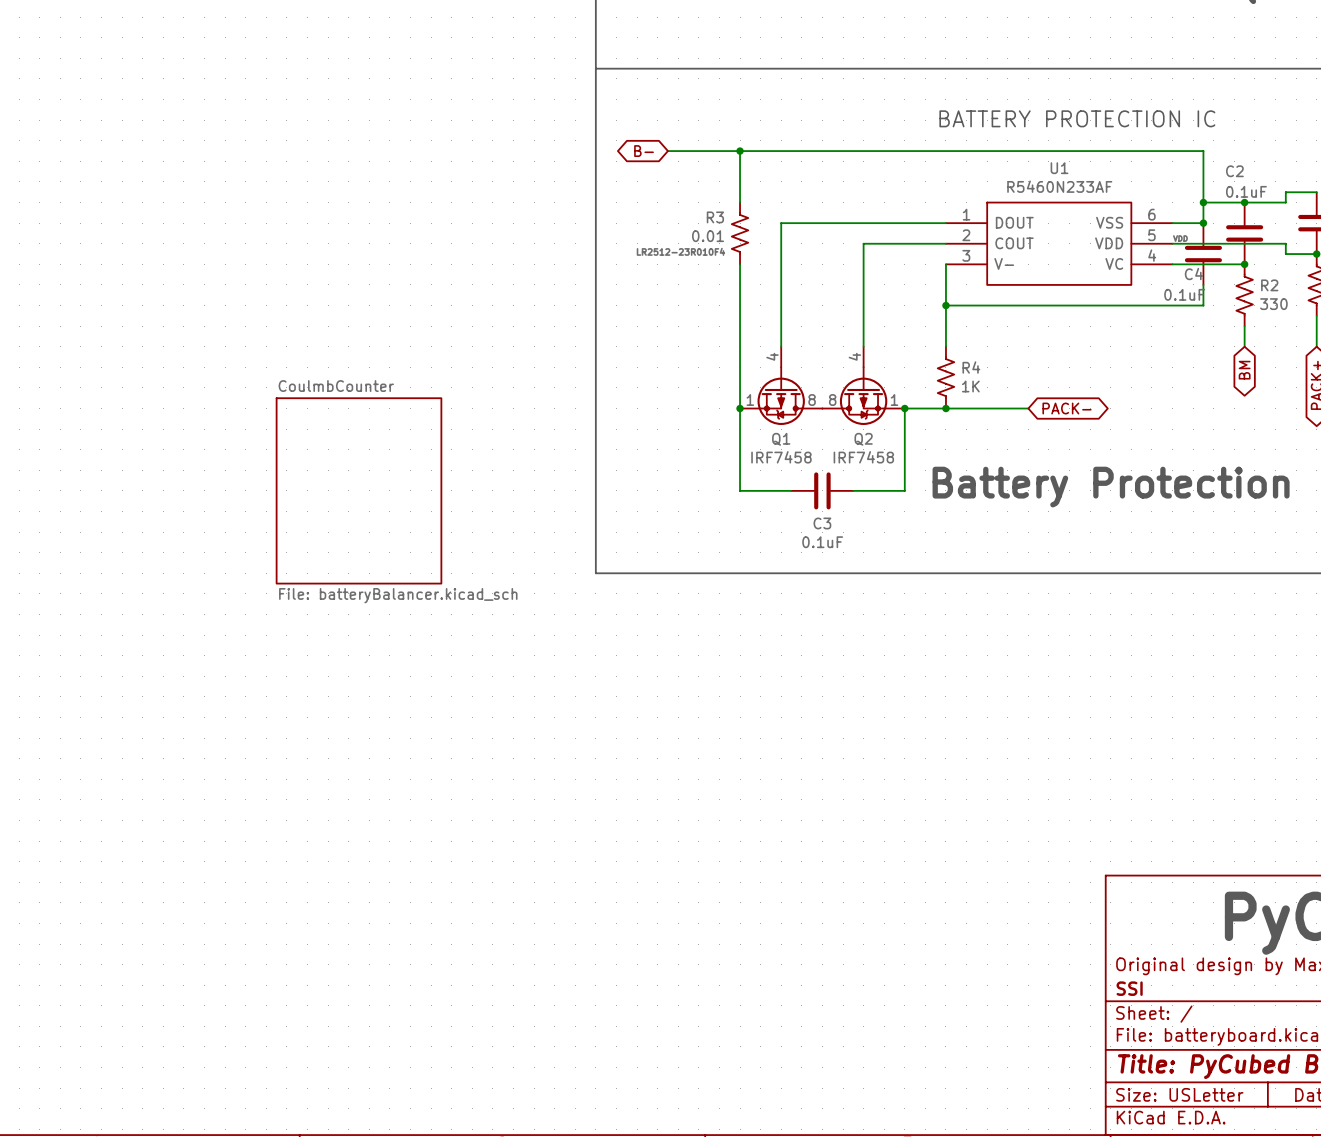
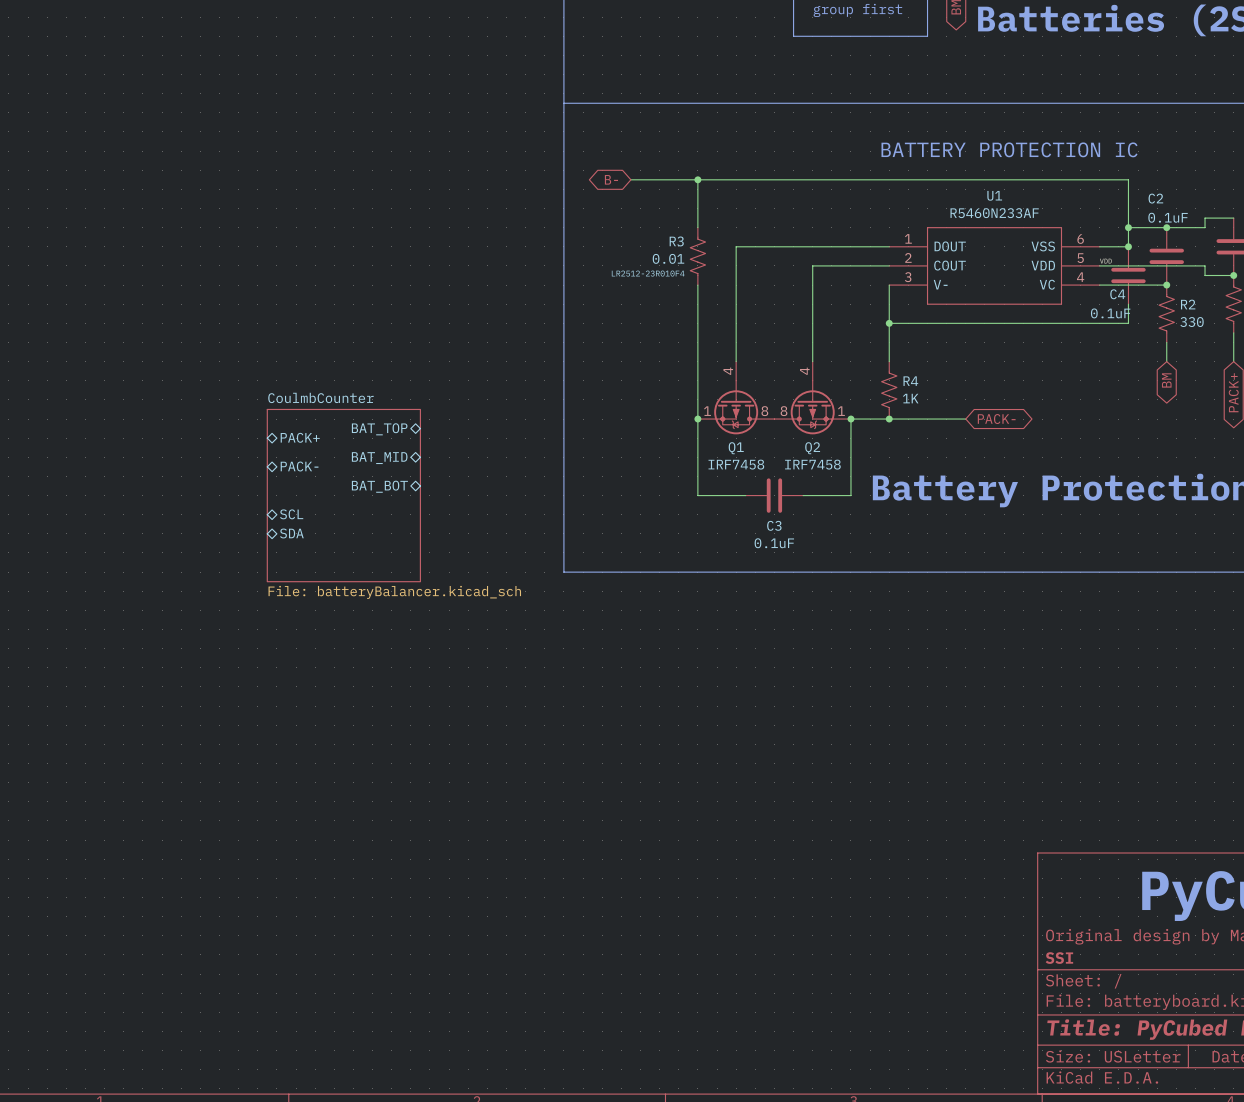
sheet pin: none -> BAT_TOP (379, 429)
sheet pin: none -> PACK+ (300, 437)
sheet pin: none -> BAT_MID (379, 458)
sheet pin: none -> PACK- (299, 466)
sheet pin: none -> BAT_BOT (379, 486)
sheet pin: none -> SCL (291, 514)
sheet pin: none -> SDA (291, 533)

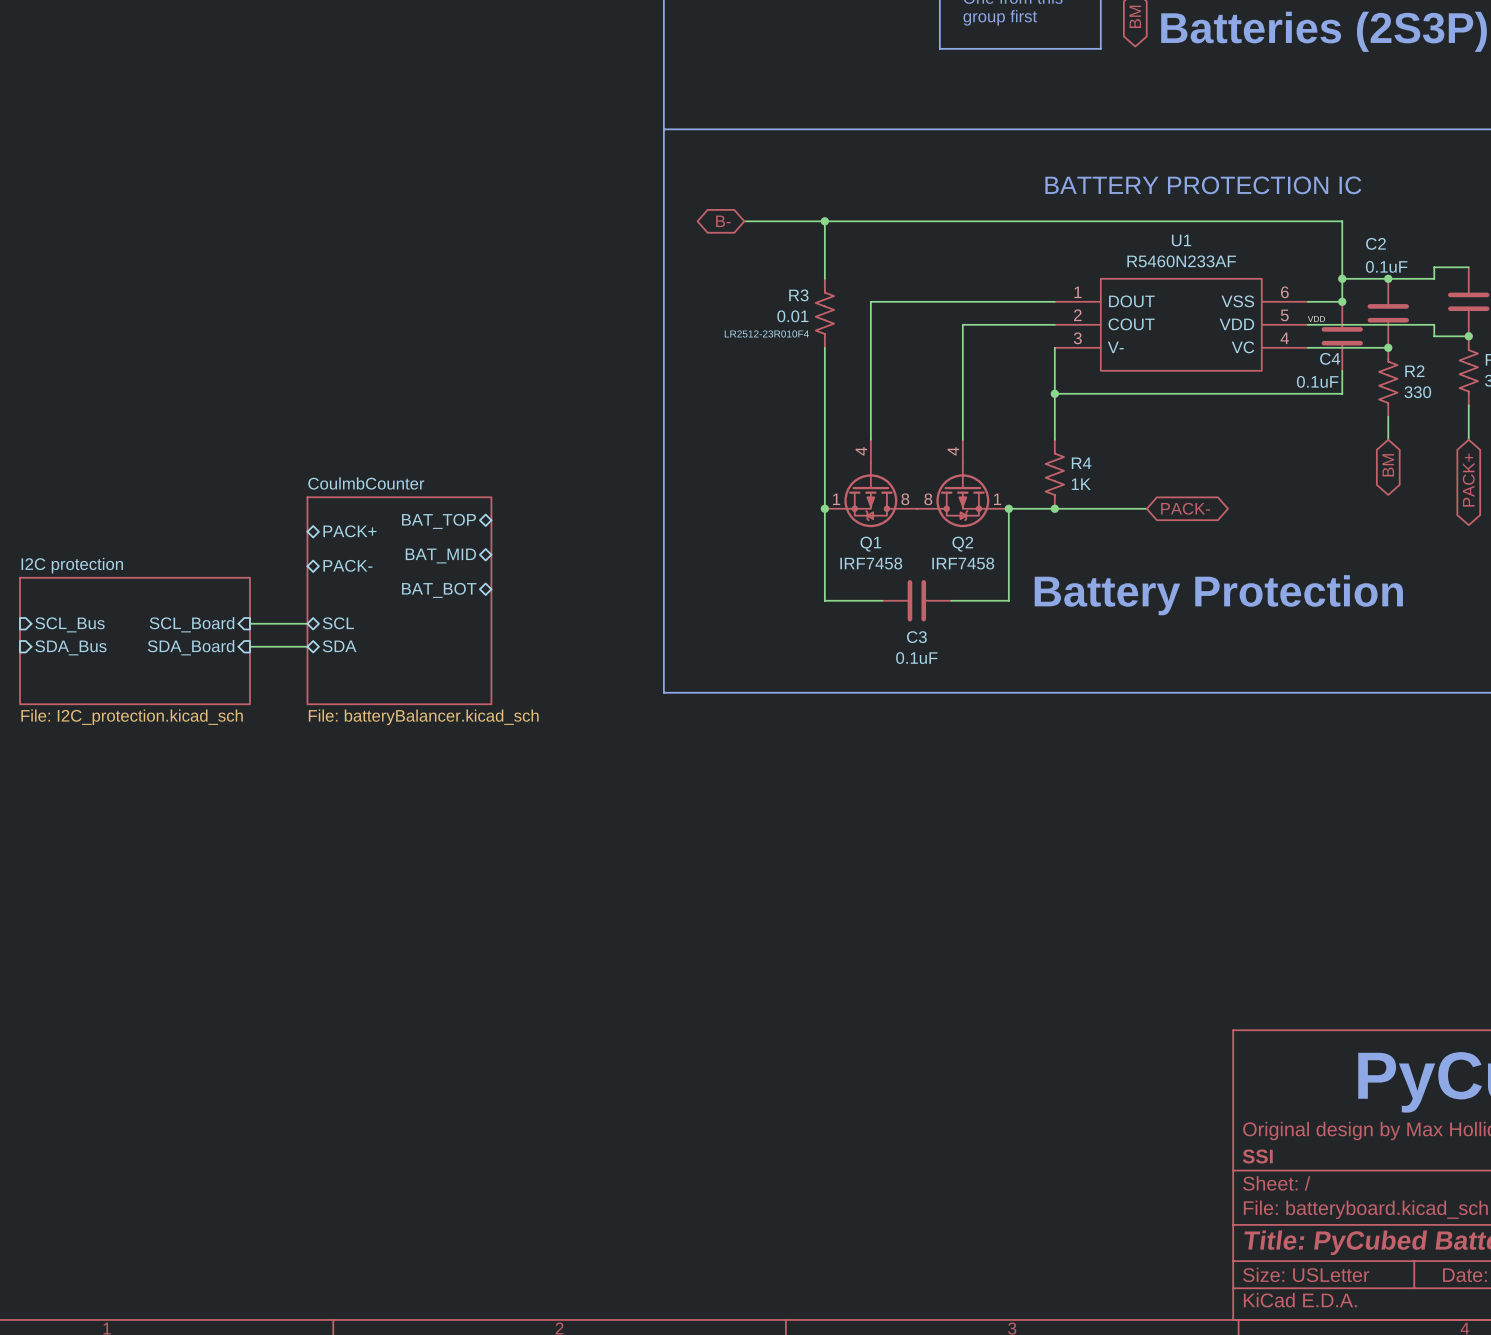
wire: none -> (249, 623) (307, 623)
sheet pin: none -> SCL_Bus (69, 624)
sheet pin: none -> SCL_Board (192, 624)
sheet I2C protection: none -> File: I2C_protection.kicad_sch (134, 641)
wire: none -> (249, 646) (307, 646)
sheet pin: none -> SDA_Bus (70, 647)
sheet pin: none -> SDA_Board (191, 647)

